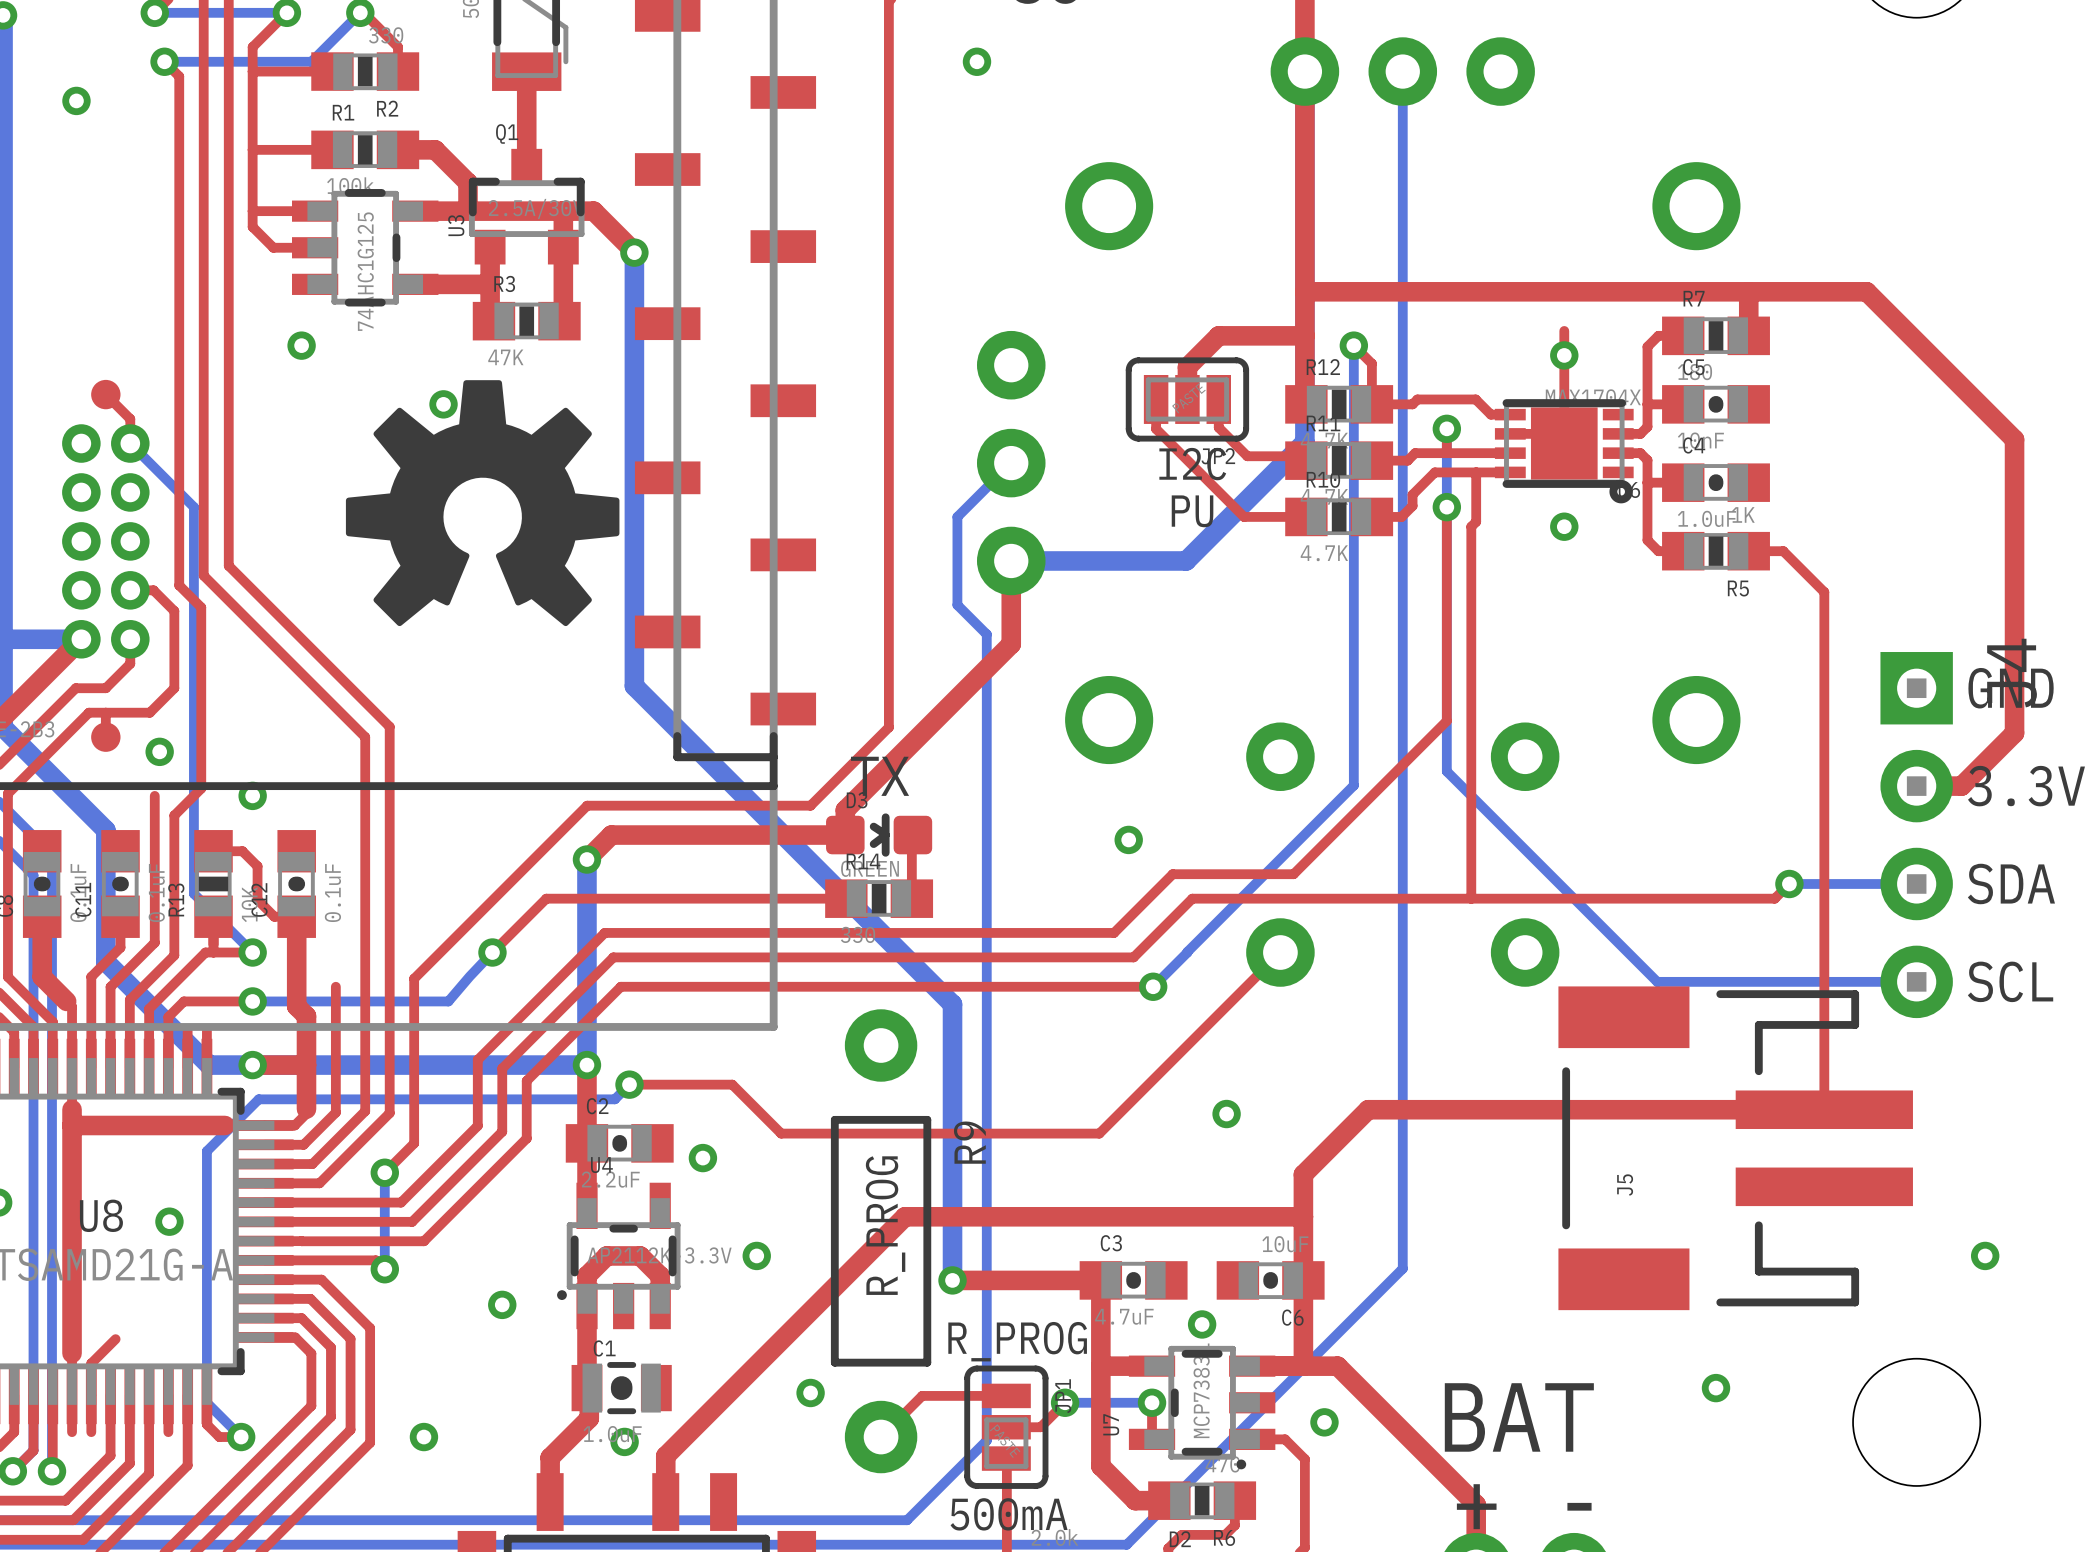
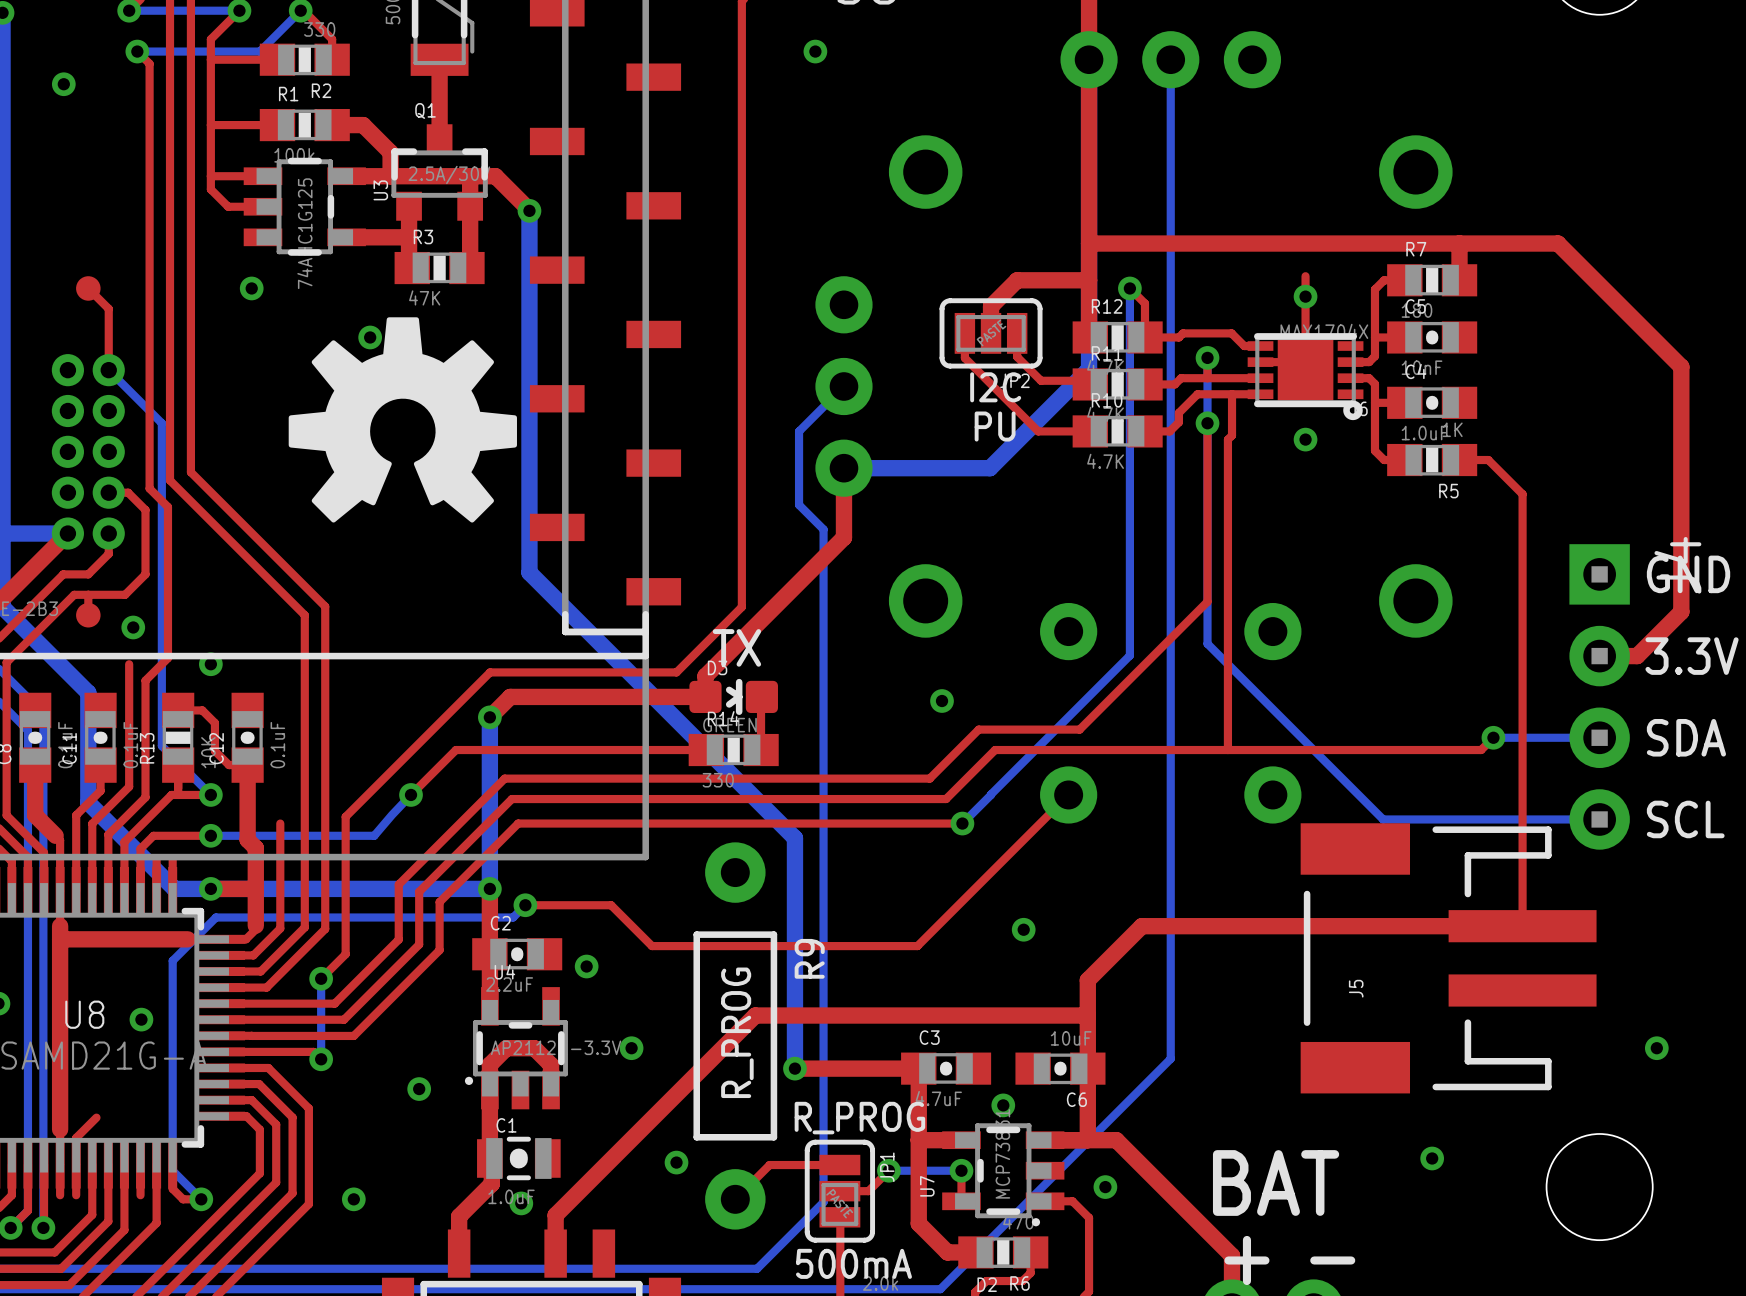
top track: (105, 394) (130, 419) -> (88, 288) (108, 308) (108, 349)
part position: (105, 394) -> (88, 288)

